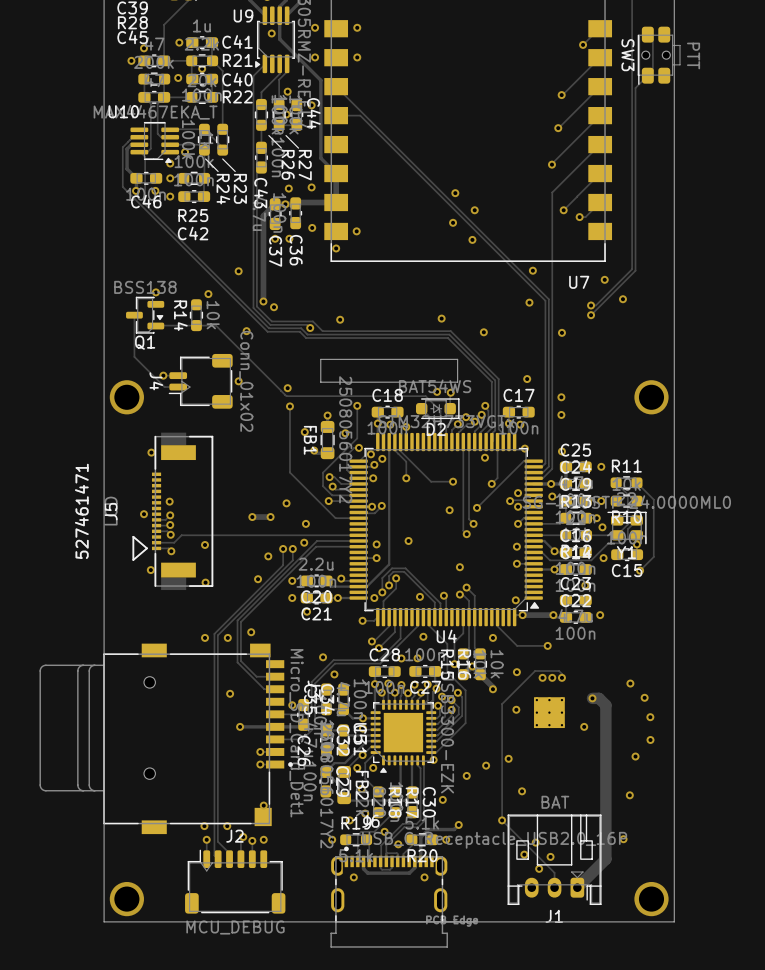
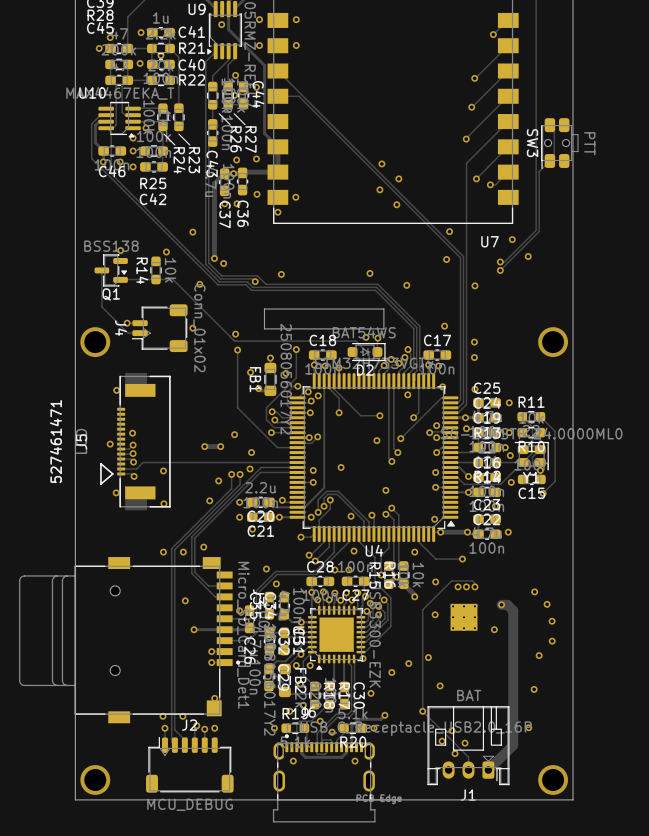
track: (652, 39) (652, 70) -> none
SW3 position: (659, 55) -> (559, 143)
track: (647, 75) (635, 88) (635, 202) -> (549, 125) (554, 129) (554, 156) (539, 171)

